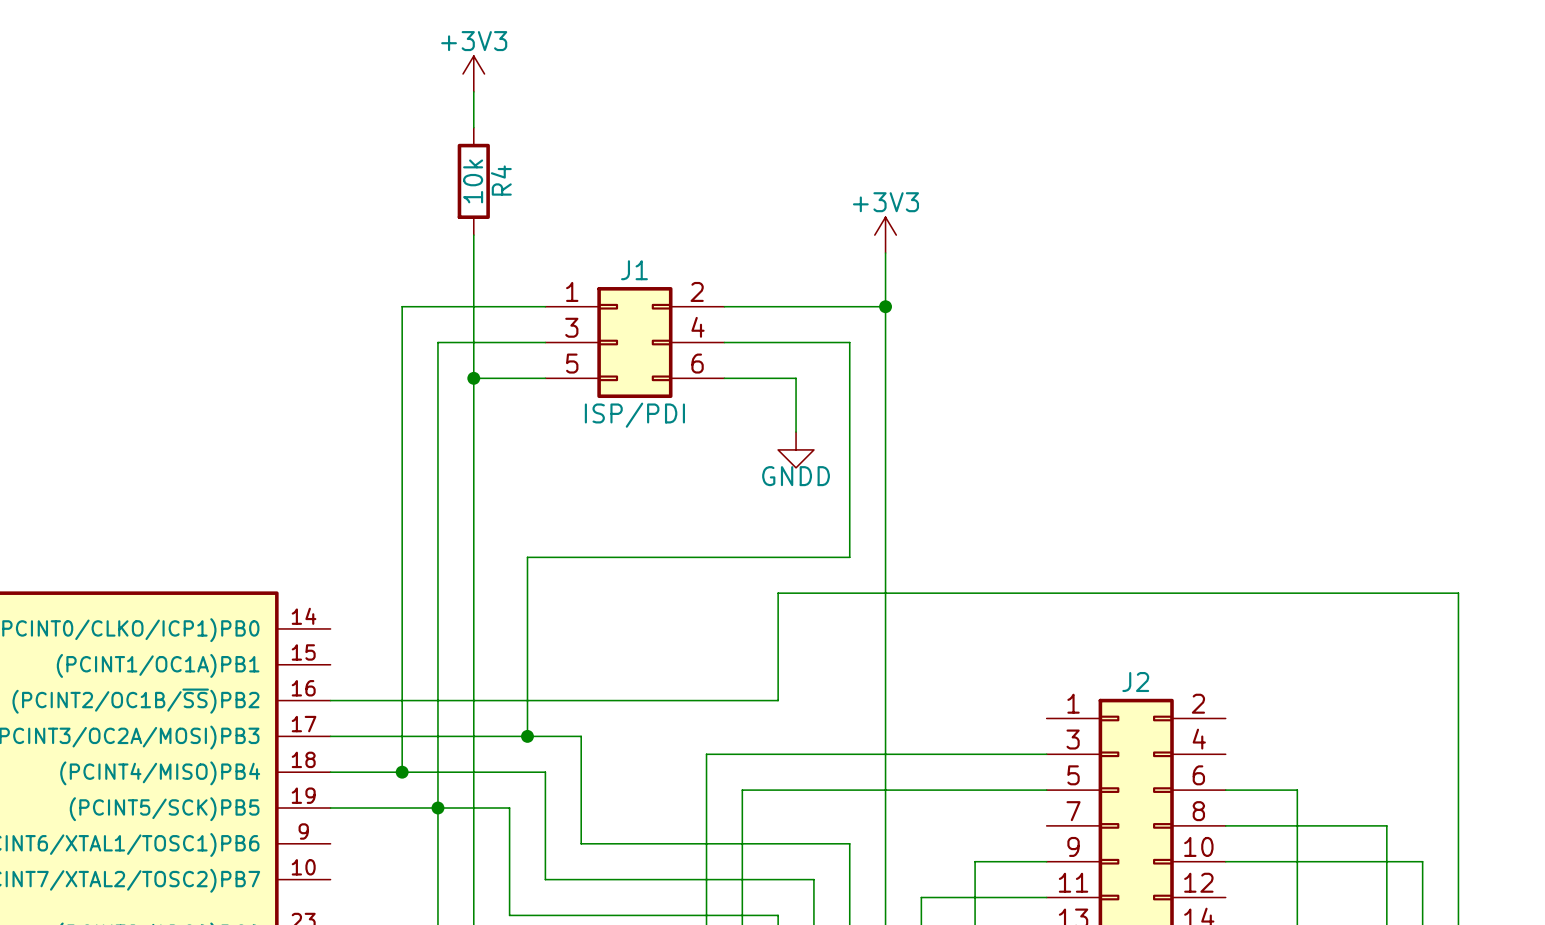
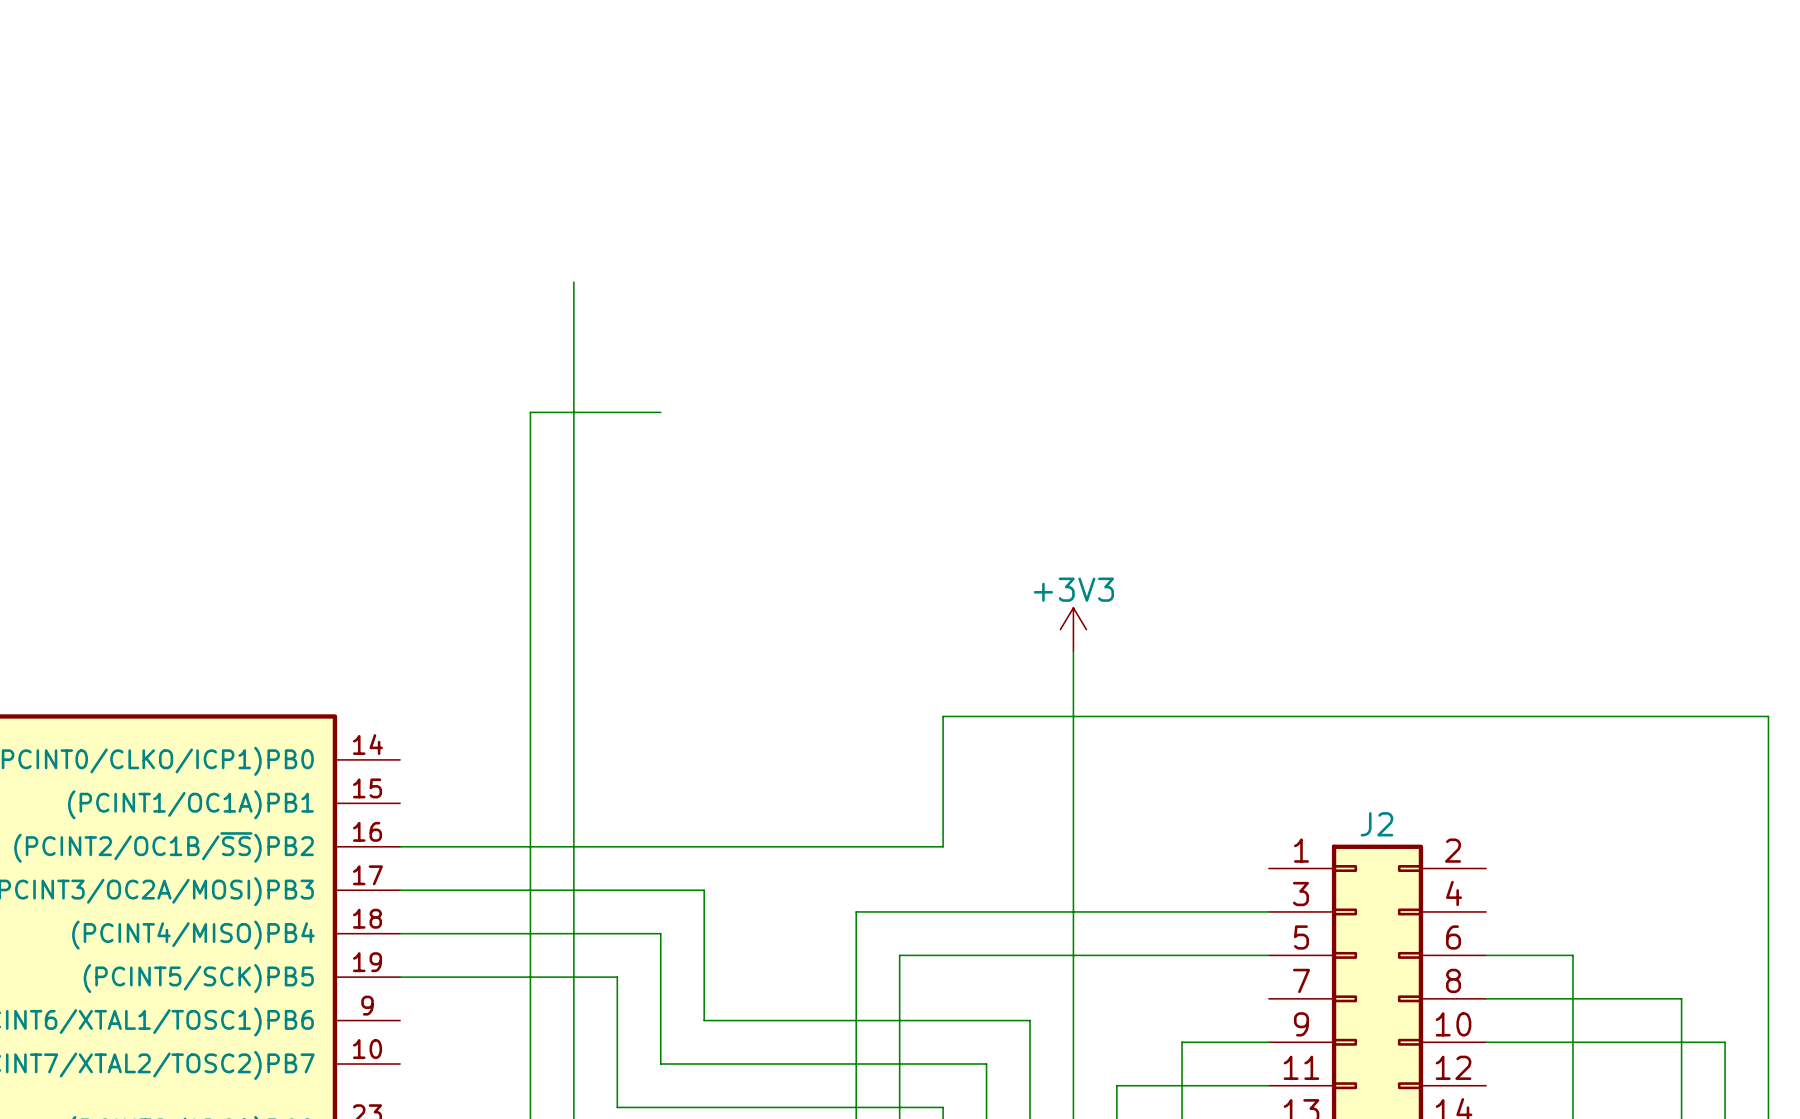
power symbol: +3V3 (473, 73) -> none
wire: (473, 91) (473, 127) -> none
R4: 10k (473, 181) -> none
power symbol position: +3V3 (885, 235) -> +3V3 (1073, 629)
wire: (885, 253) (885, 539) -> none
wire: (545, 306) (402, 306) (402, 772) -> none
wire: (724, 306) (885, 306) -> none
junction: (885, 306) -> none
J1: ISP/PDI (634, 342) -> none
wire: (724, 342) (849, 342) (849, 557) (527, 557) (527, 736) -> none
wire: (473, 378) (545, 378) -> none
junction: (473, 378) -> none
wire: (724, 378) (796, 378) (796, 432) -> none
power symbol: GNDD (796, 449) -> none
junction: (527, 736) -> none
junction: (402, 772) -> none
junction: (437, 808) -> none

